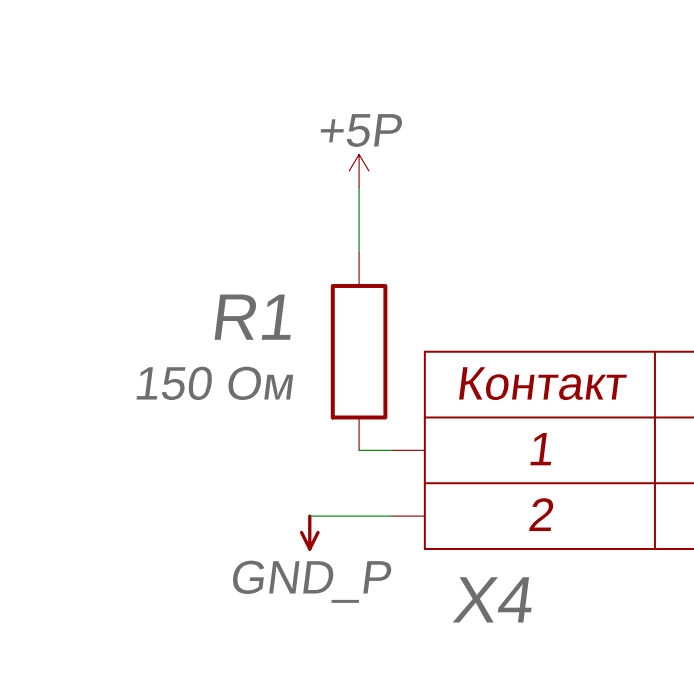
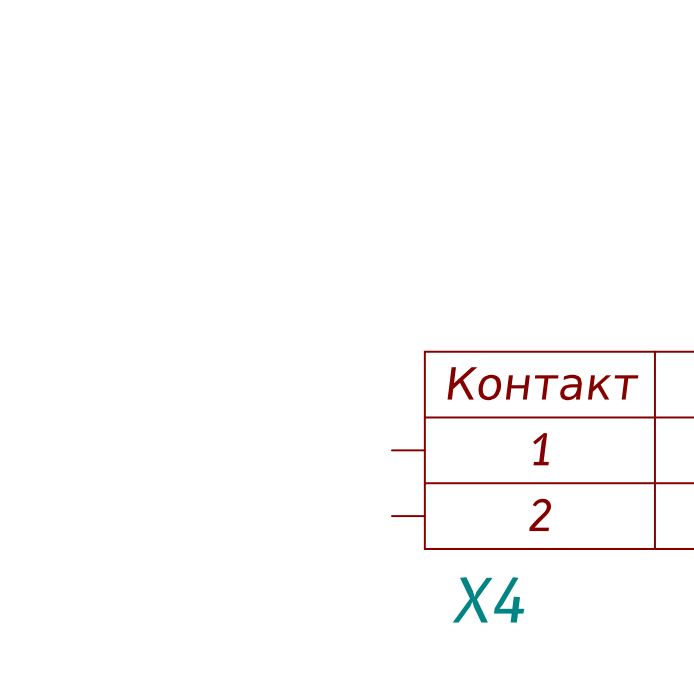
power symbol: +5P (359, 170) -> none
wire: (359, 187) (359, 253) -> none
R1: 150 Ом (359, 351) -> none
wire: (359, 450) (391, 450) -> none
wire: (309, 516) (391, 516) -> none
power symbol: GND_P (309, 532) -> none

